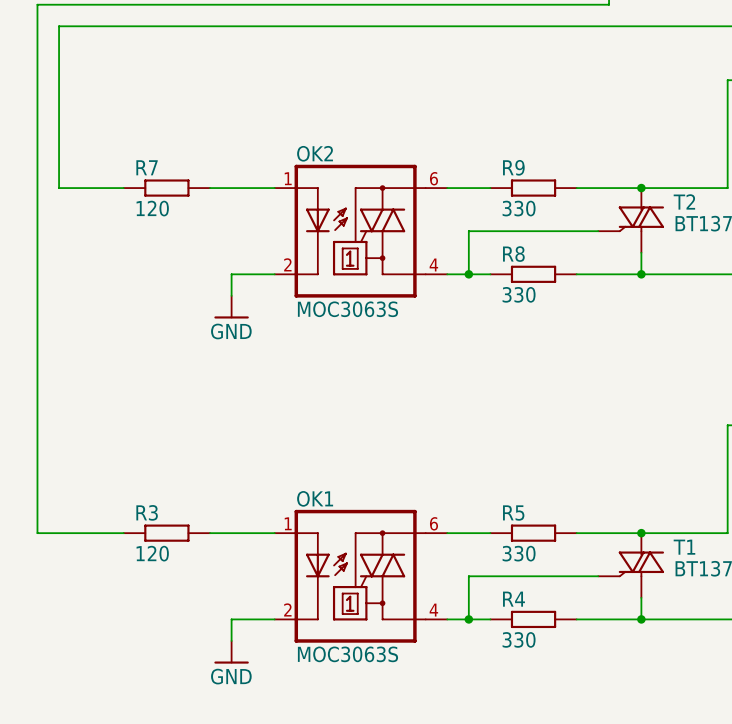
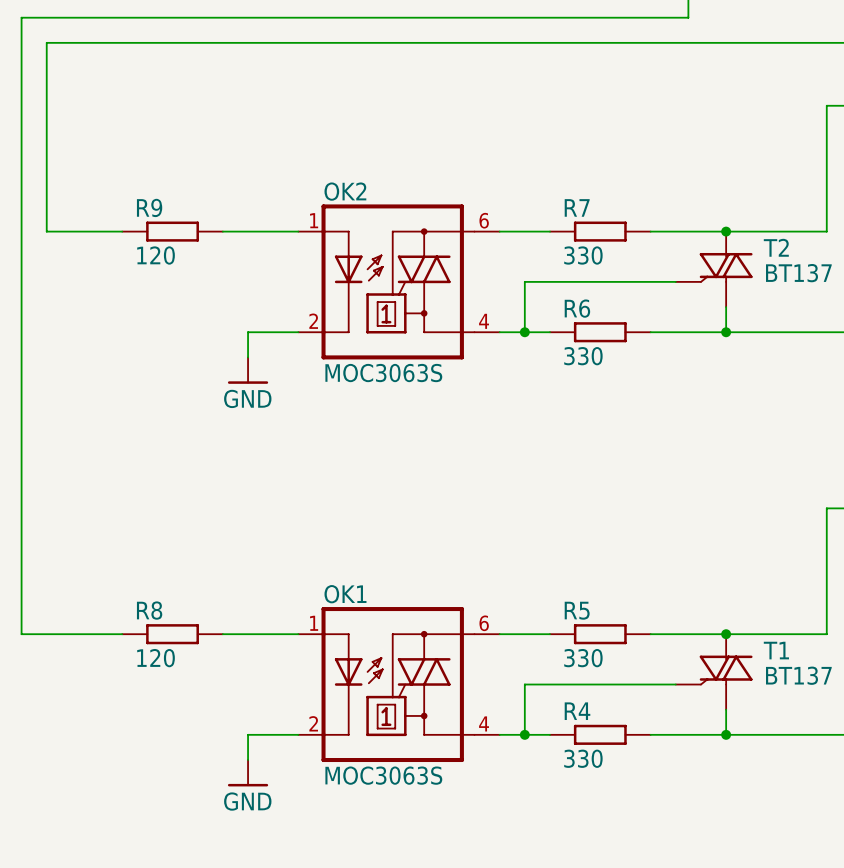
R7 name: R7 (147, 167) -> R9 (149, 207)
R9 name: R9 (513, 167) -> R7 (577, 207)
R8 name: R8 (513, 254) -> R6 (577, 308)
R3 name: R3 (147, 512) -> R8 (149, 610)

